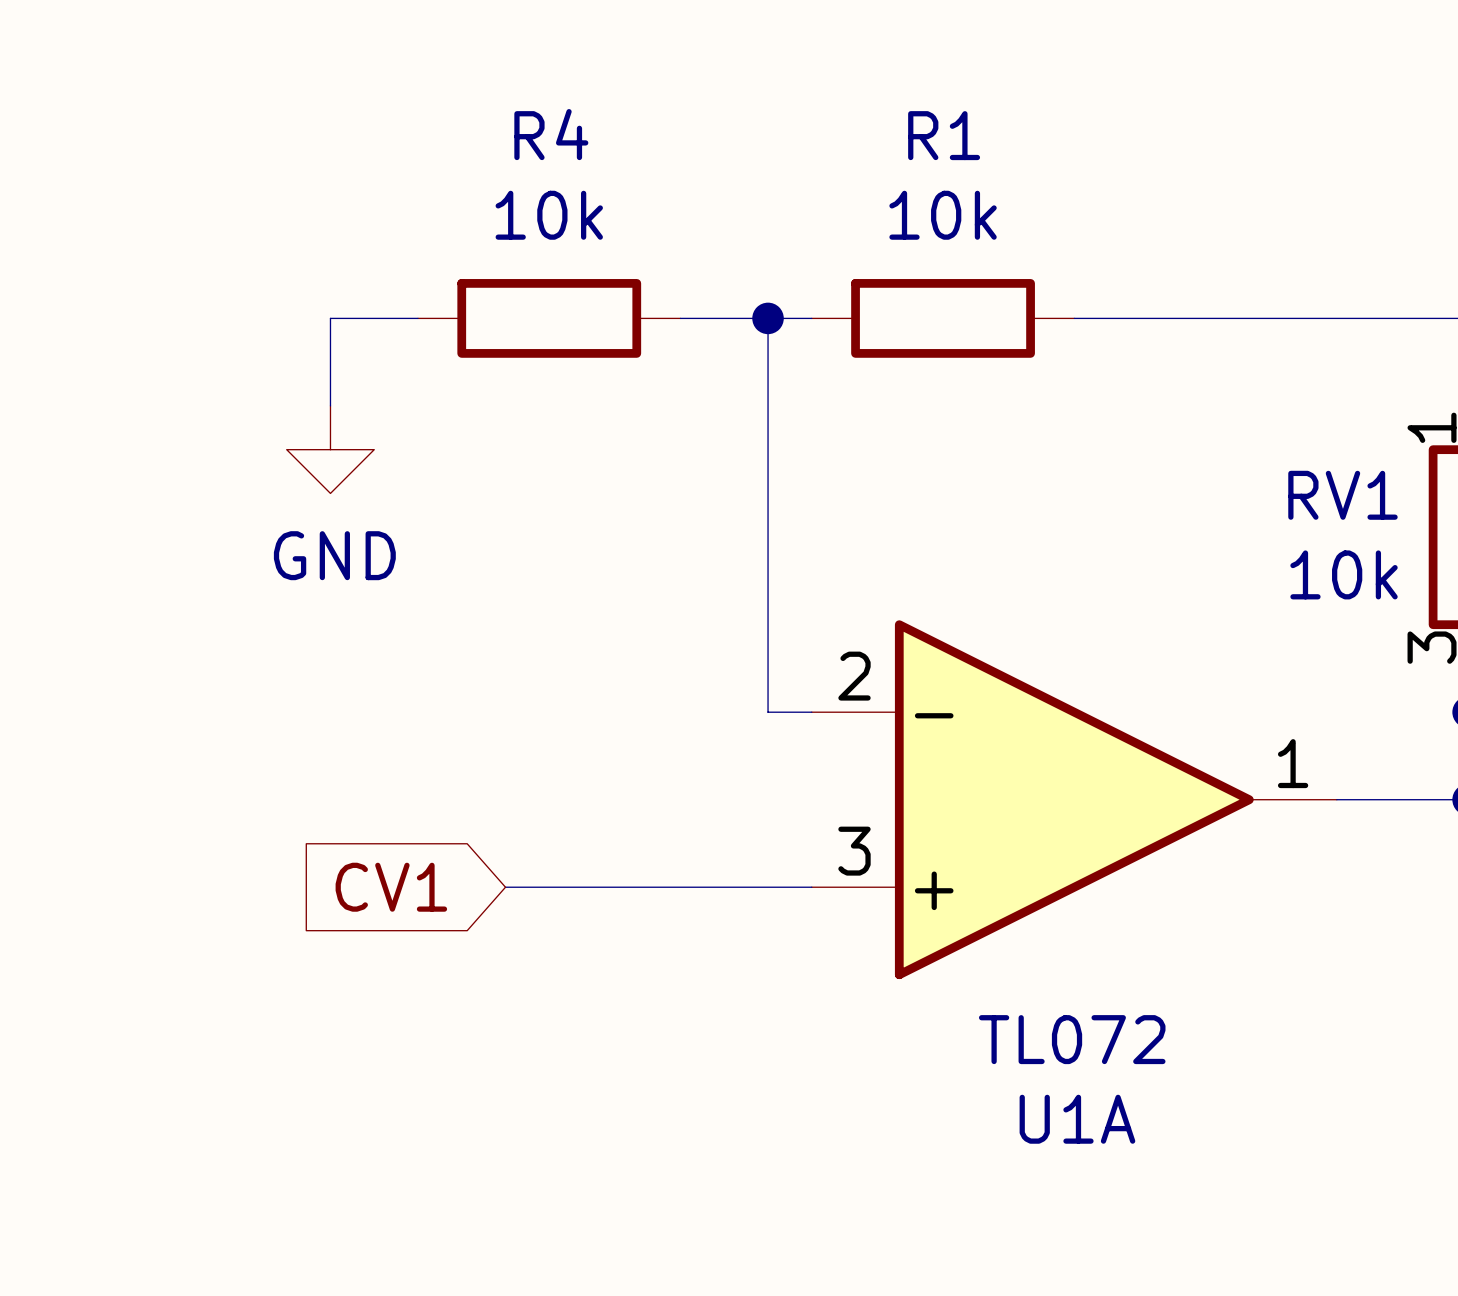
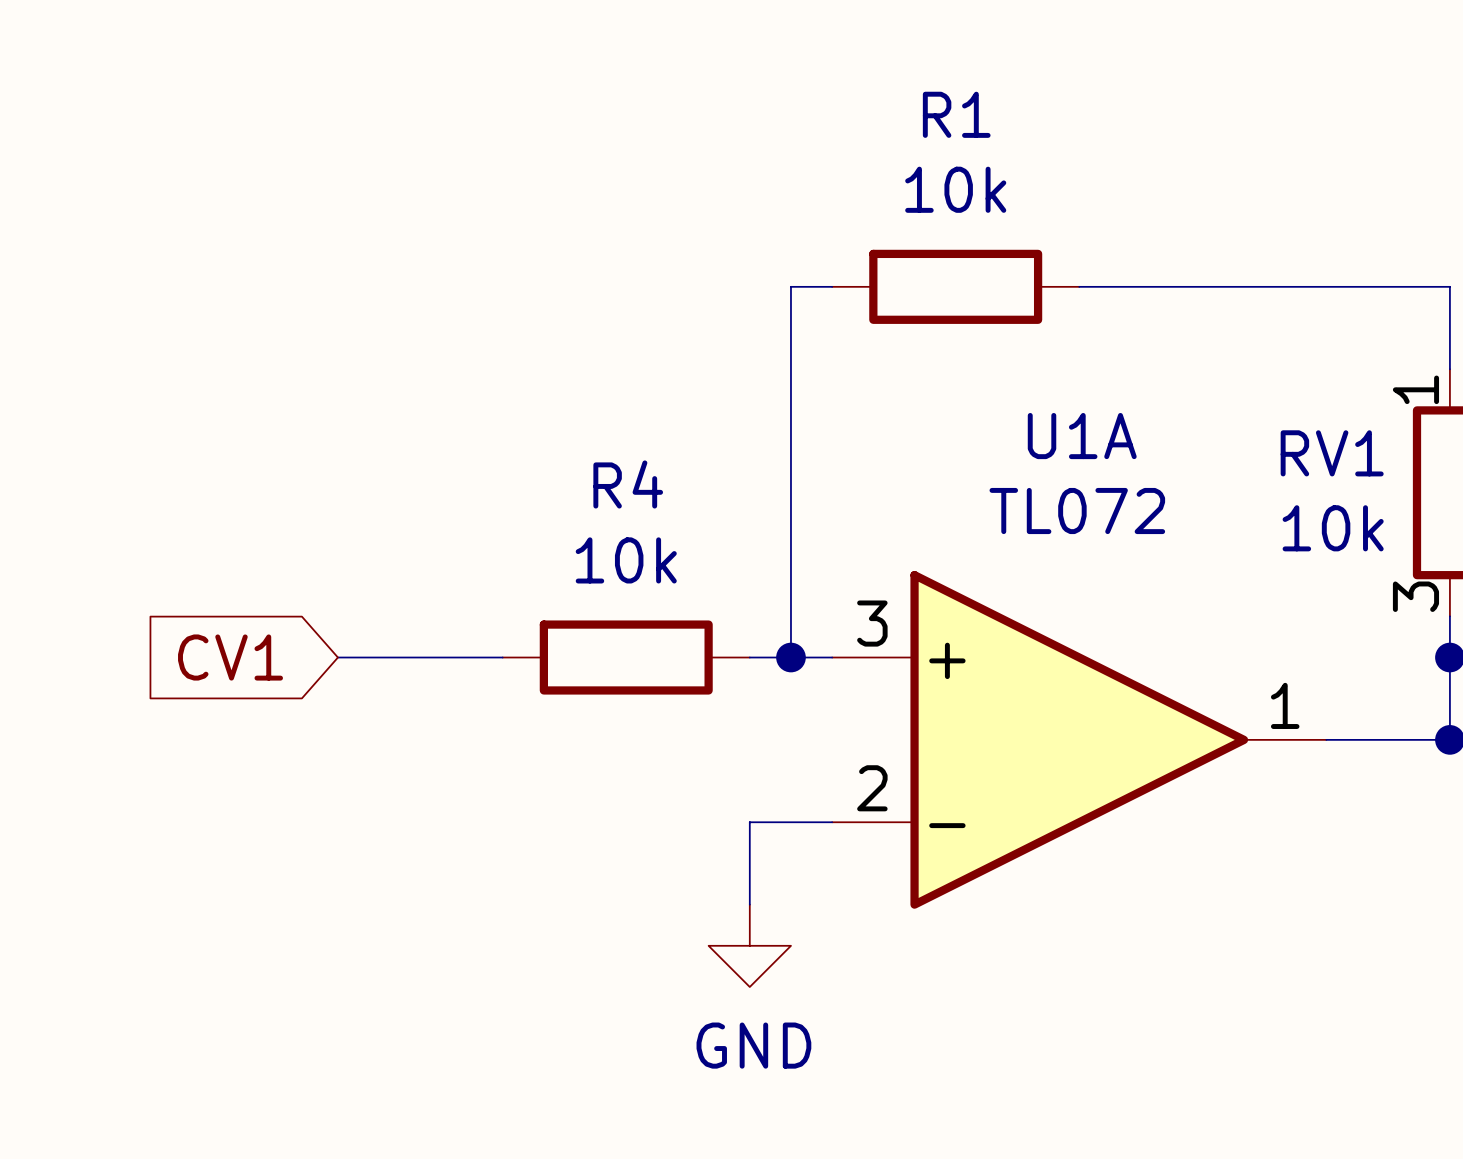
wire: (417, 318) (330, 318) (330, 405) -> none
R4 position: (549, 318) -> (626, 657)
wire: (680, 318) (768, 318) -> none
junction: (768, 318) -> none
power symbol position: GND (330, 449) -> GND (749, 945)
wire: none -> (337, 657) (502, 657)
wire: none -> (749, 657) (790, 657)
junction: none -> (790, 657)
U1A flip: as is (1074, 799) -> up-down (1079, 739)
global label position: CV1 (391, 887) -> CV1 (230, 657)
wire: (505, 887) (724, 887) -> (749, 904) (749, 822)

